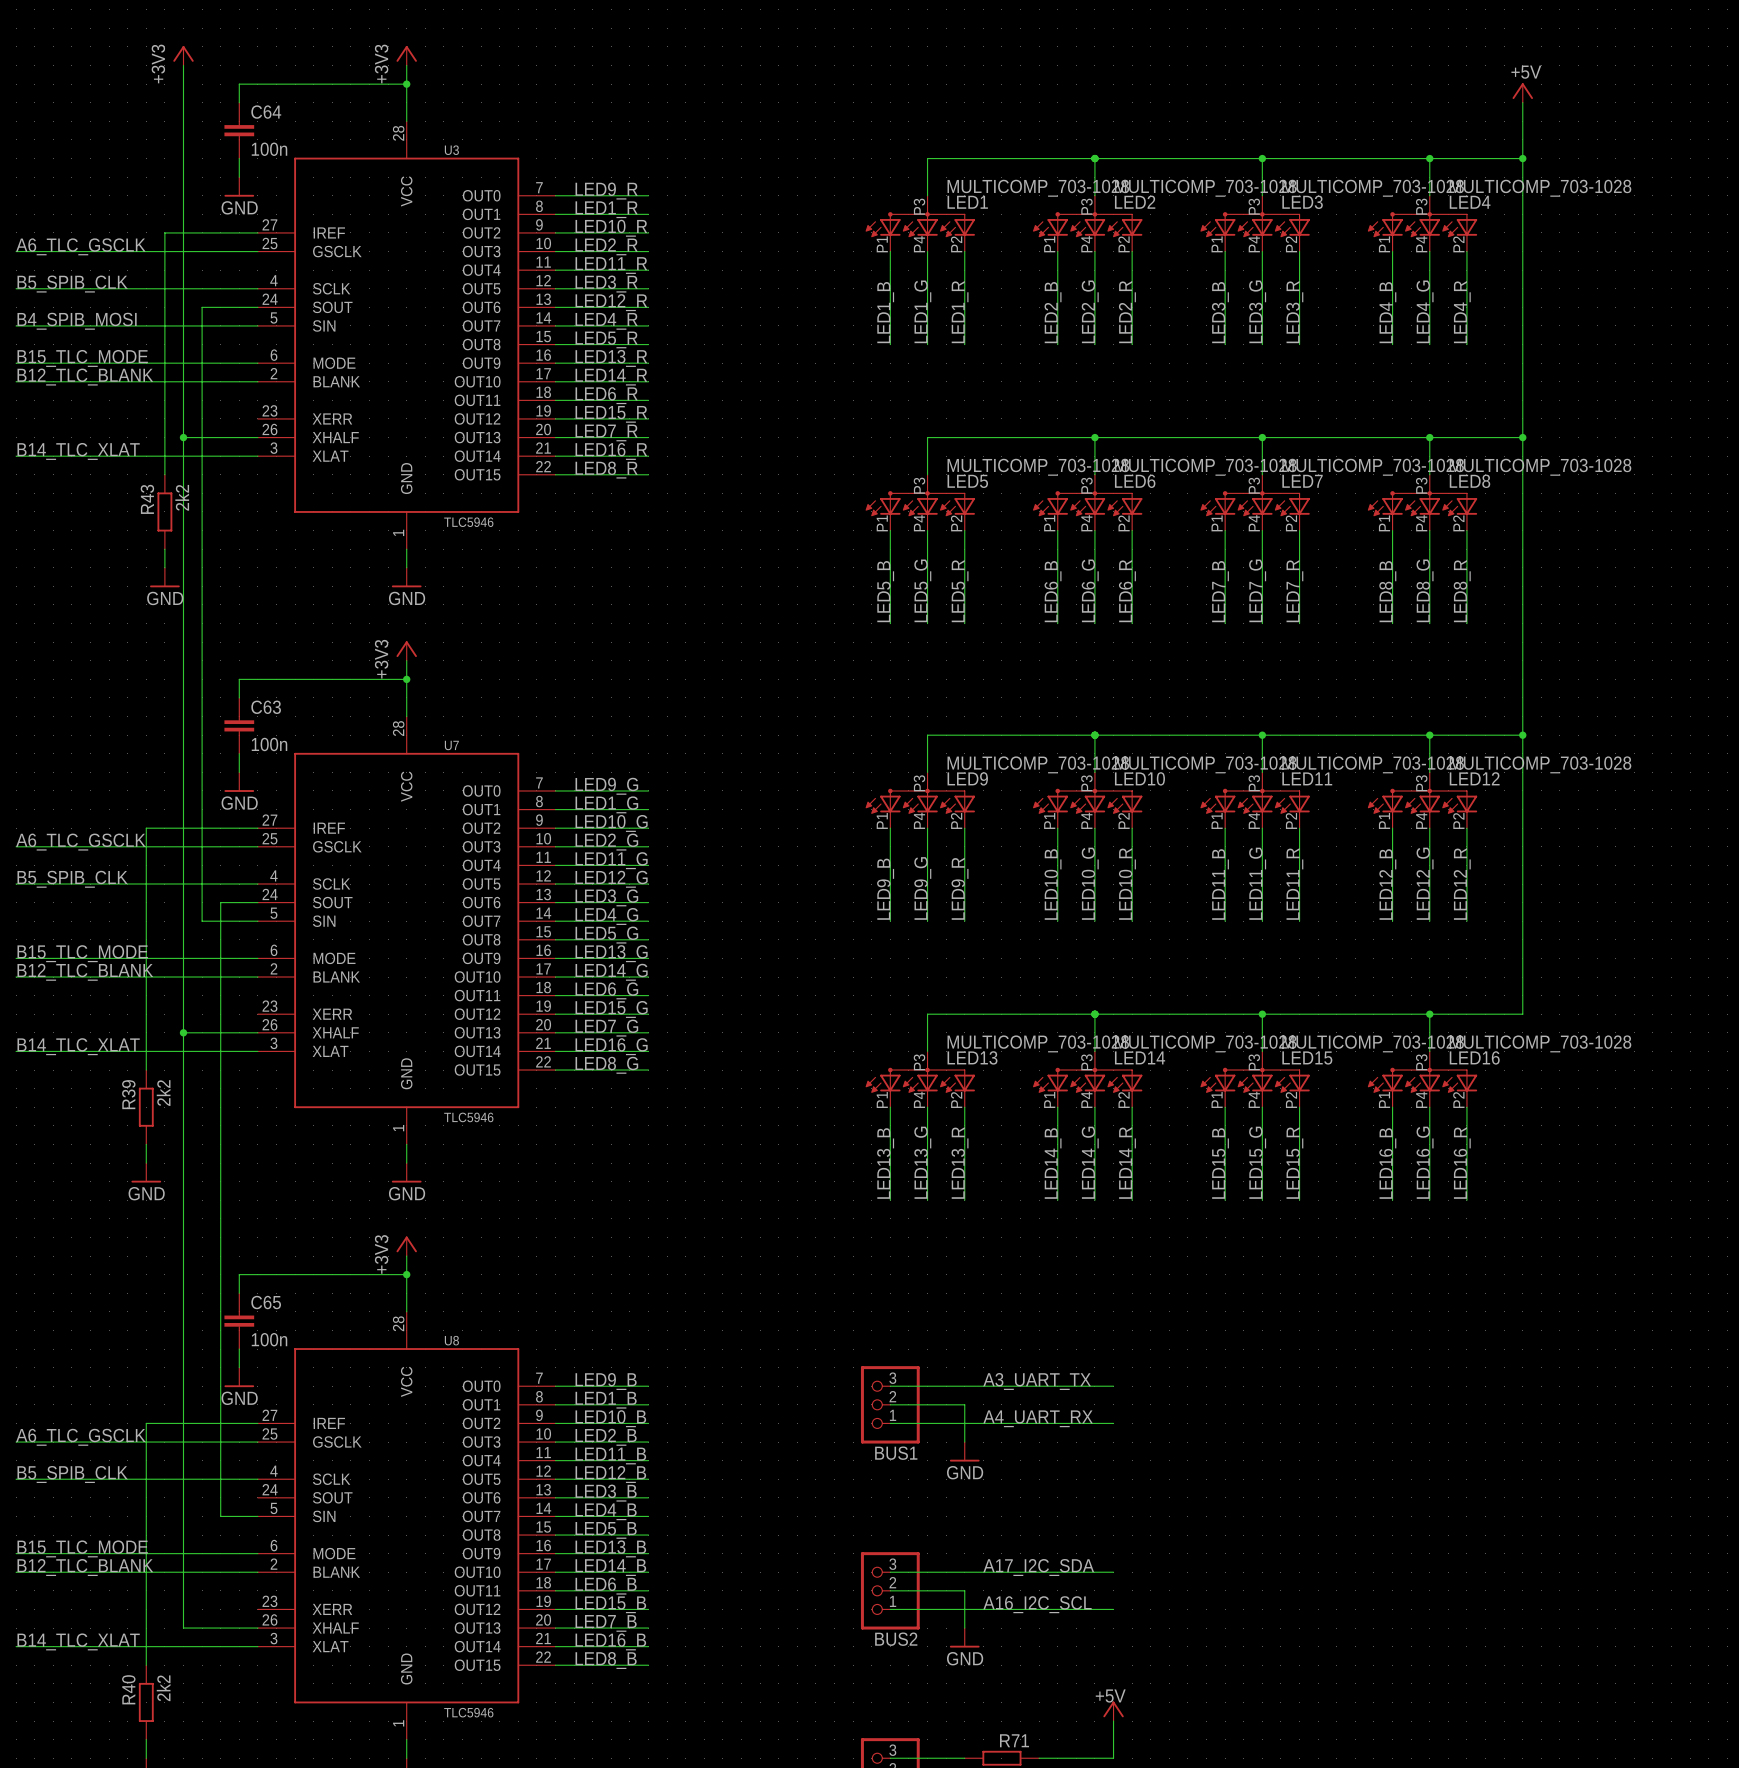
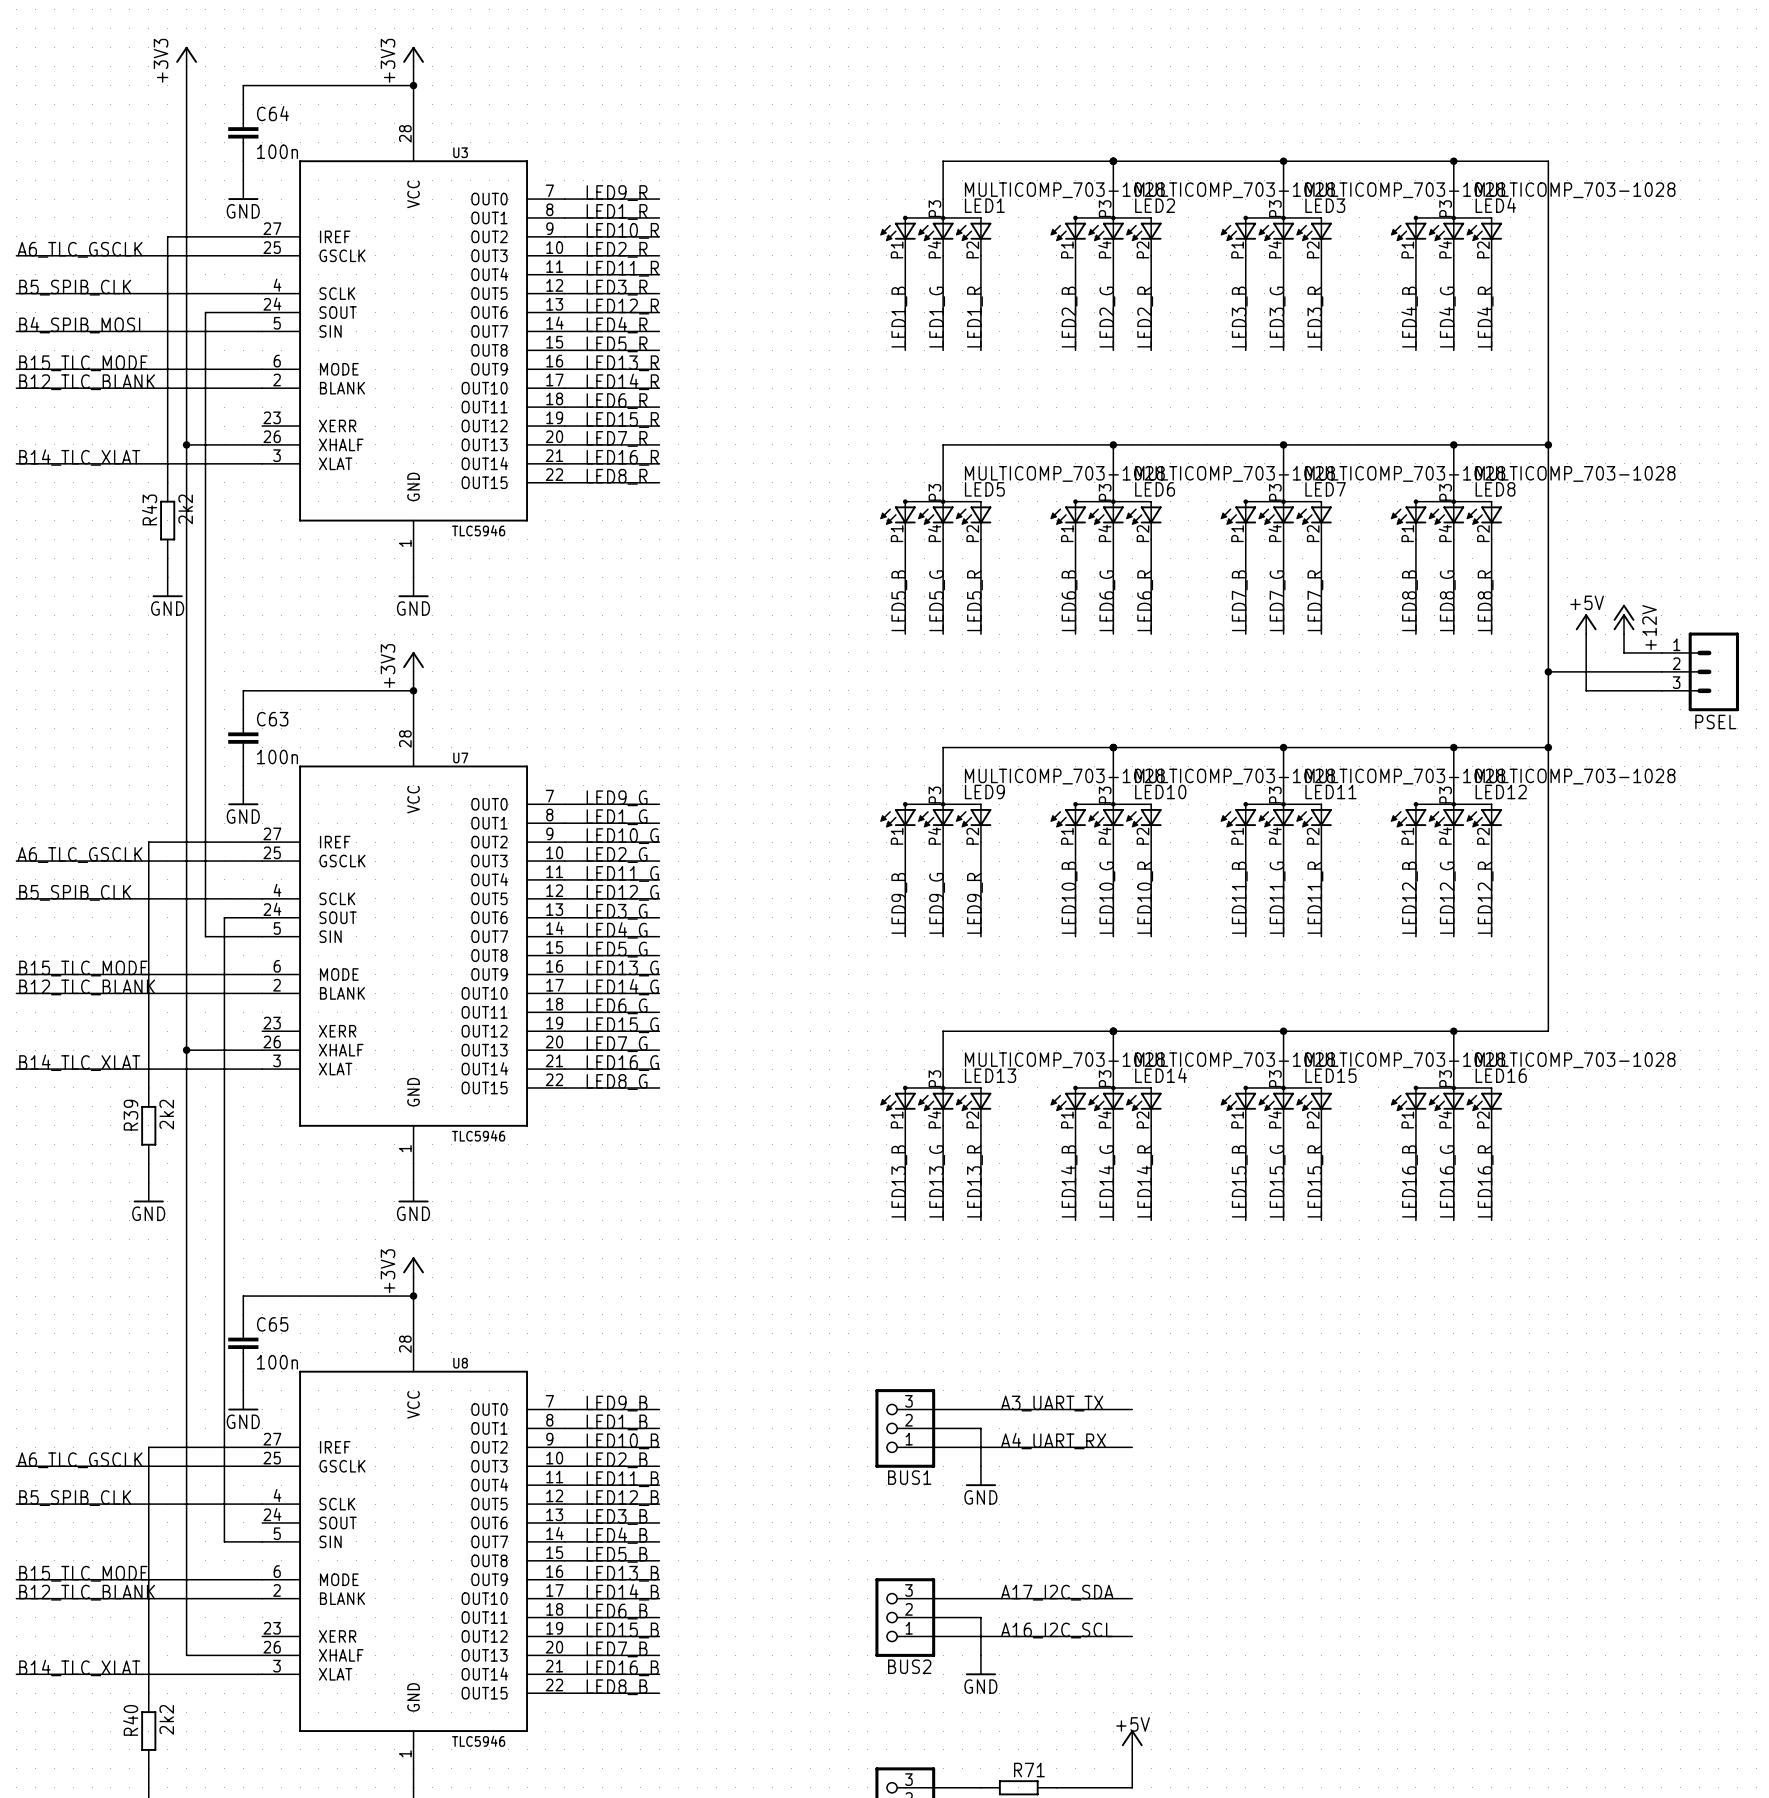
power symbol: +5V (1522, 92) -> none
wire: (1522, 102) (1522, 158) -> none
junction: (1522, 158) -> none
power symbol: none -> +12V (1624, 619)
power symbol: none -> +5V (1586, 624)
wire: none -> (1586, 634) (1586, 690) (1661, 690)
wire: none -> (1624, 634) (1624, 652) (1661, 652)
wire: none -> (1548, 671) (1661, 671)
junction: none -> (1548, 671)
PSEL: none -> (1700, 671)

